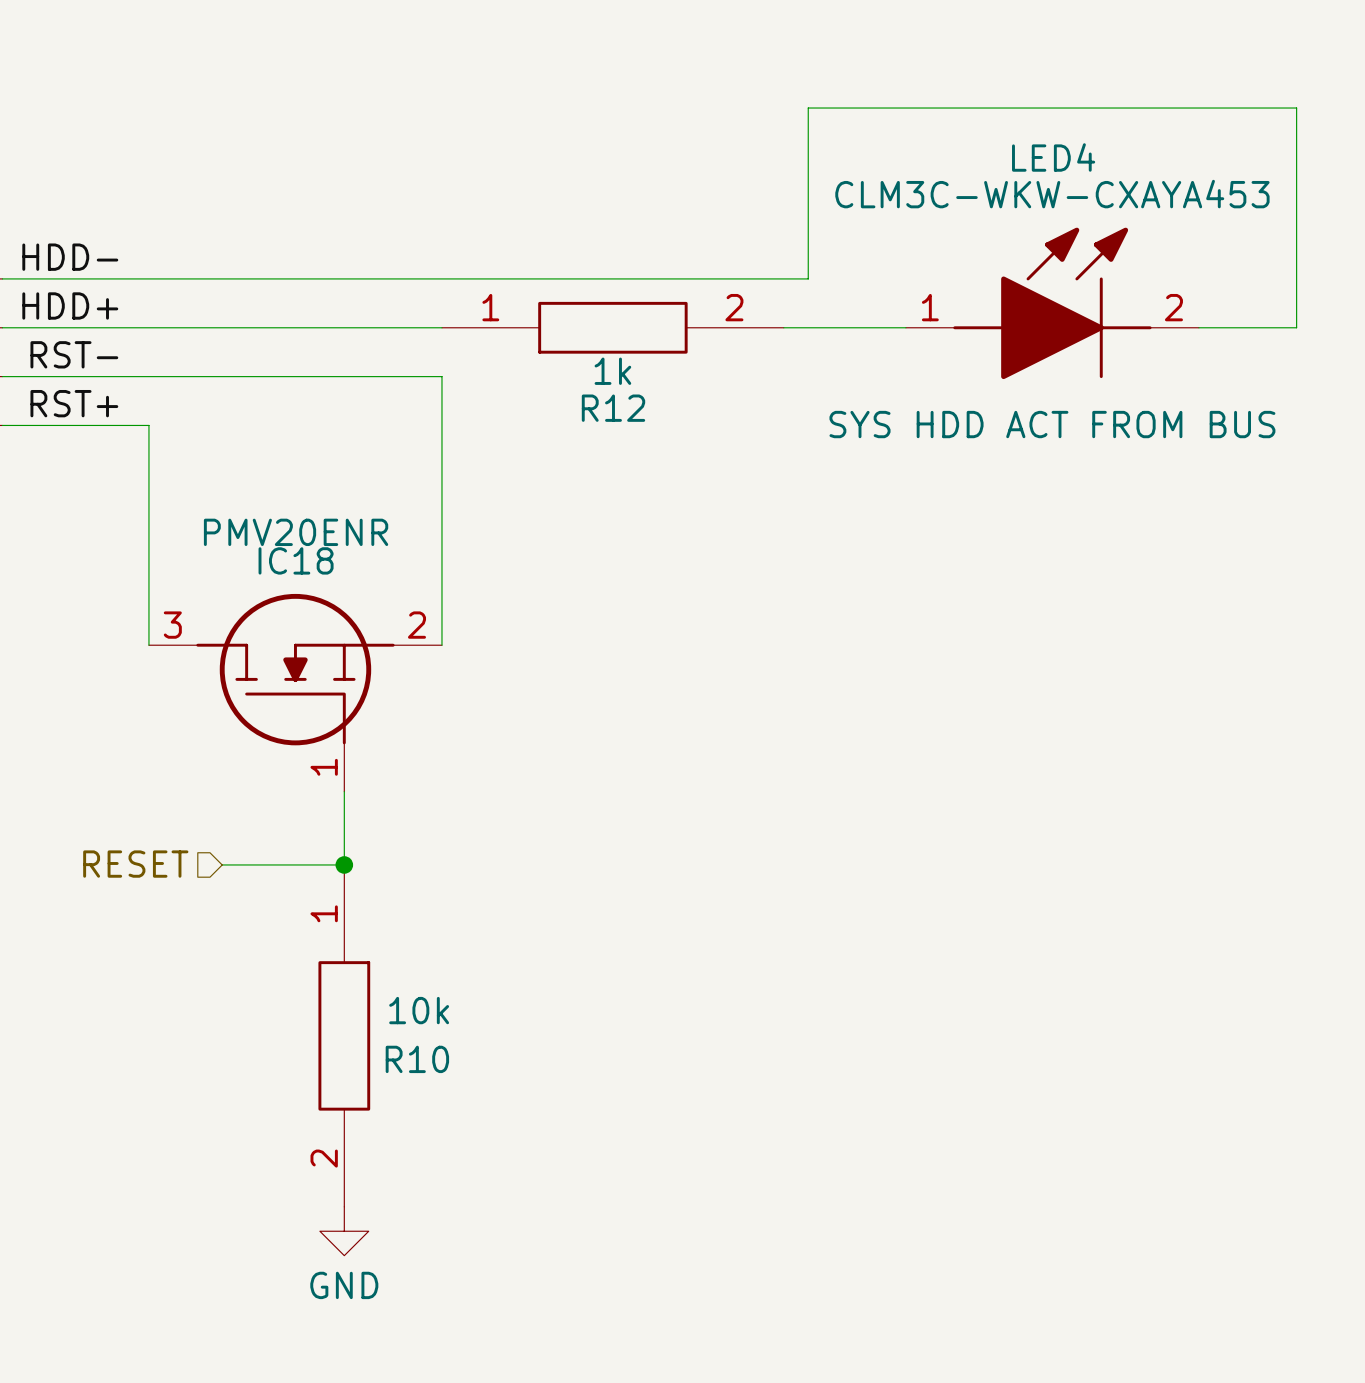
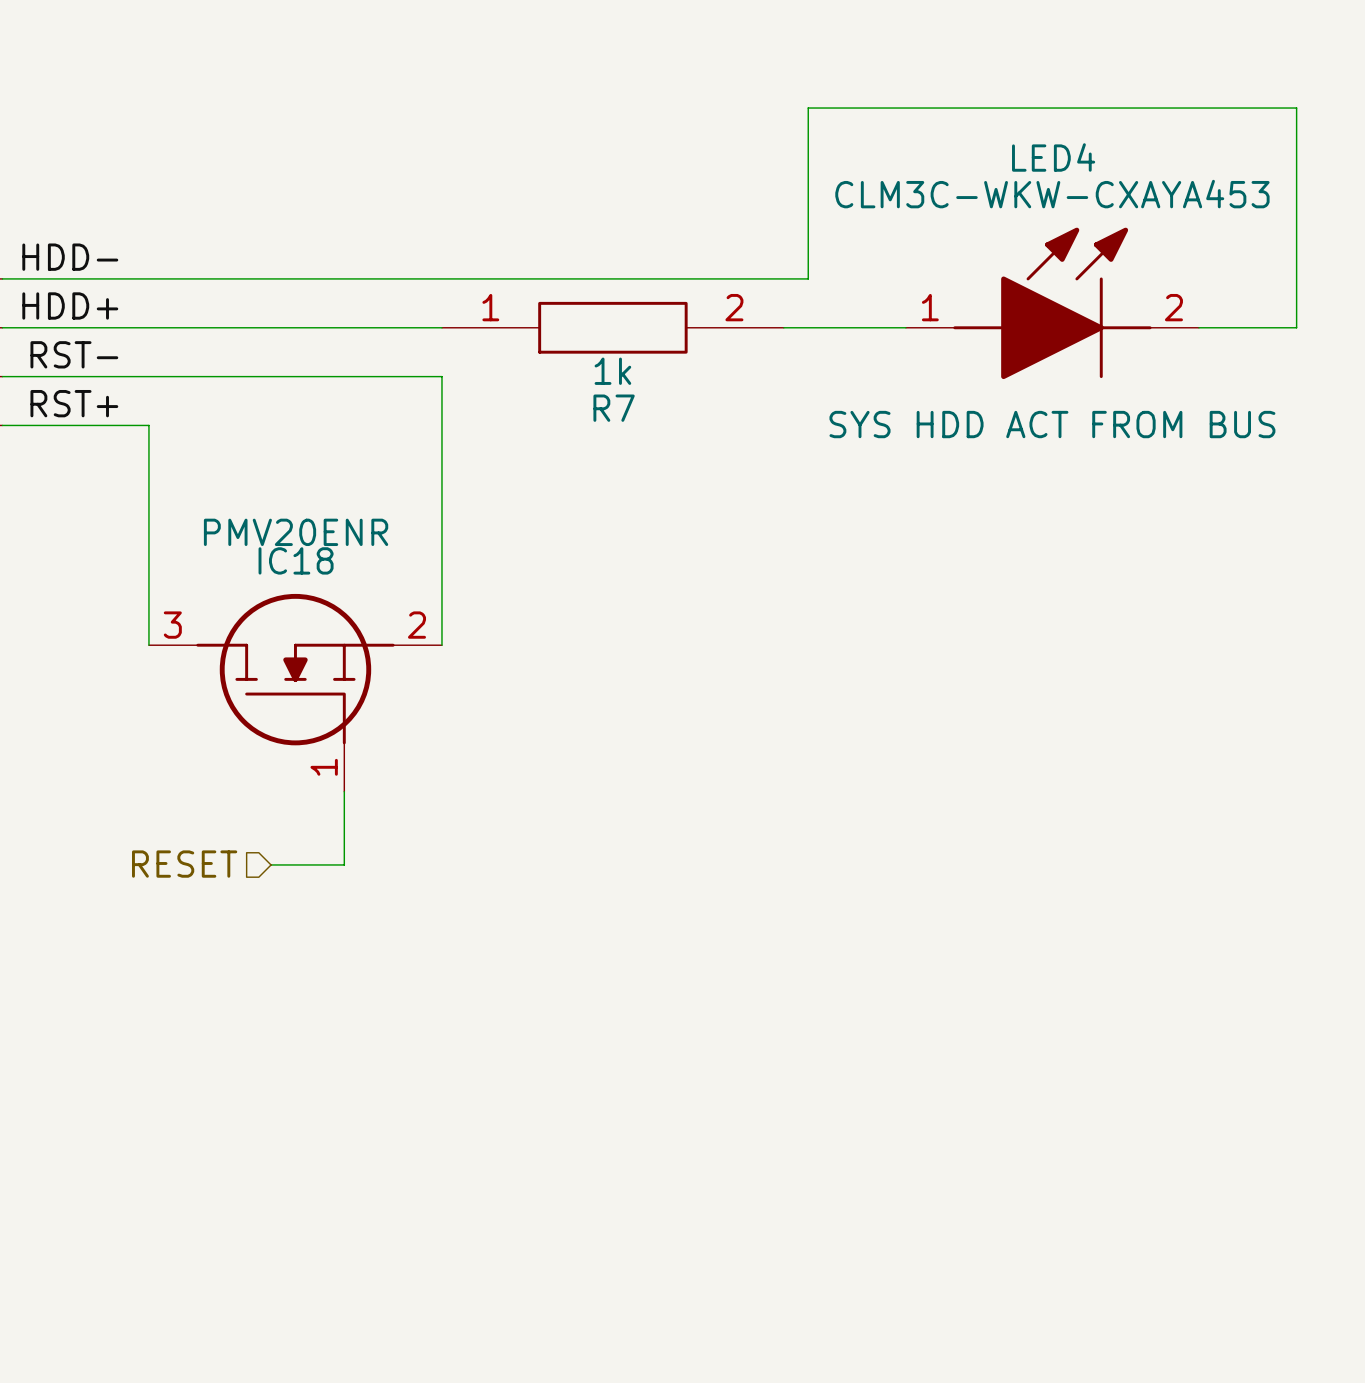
R12 name: R12 (613, 408) -> R7 (614, 408)
hierarchical label position: RESET (135, 864) -> RESET (184, 864)
wire: (222, 864) (271, 864) -> none
junction: (344, 864) -> none
R10: 10k (344, 1035) -> none
power symbol: GND (344, 1231) -> none

